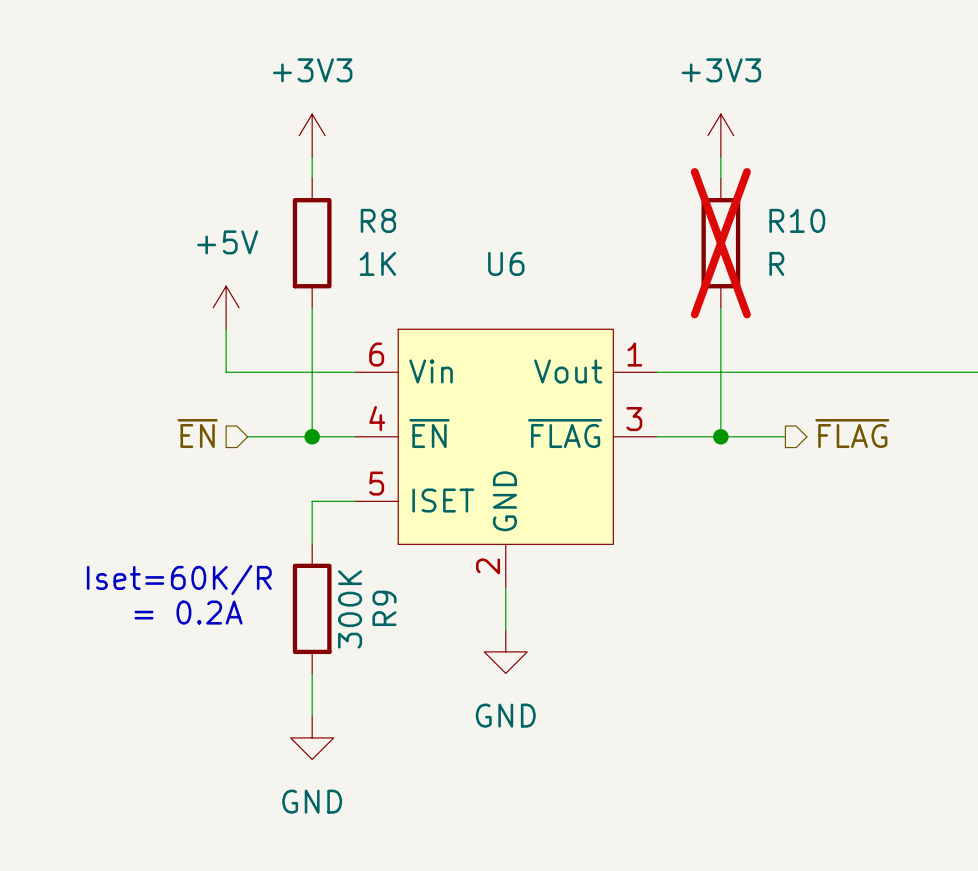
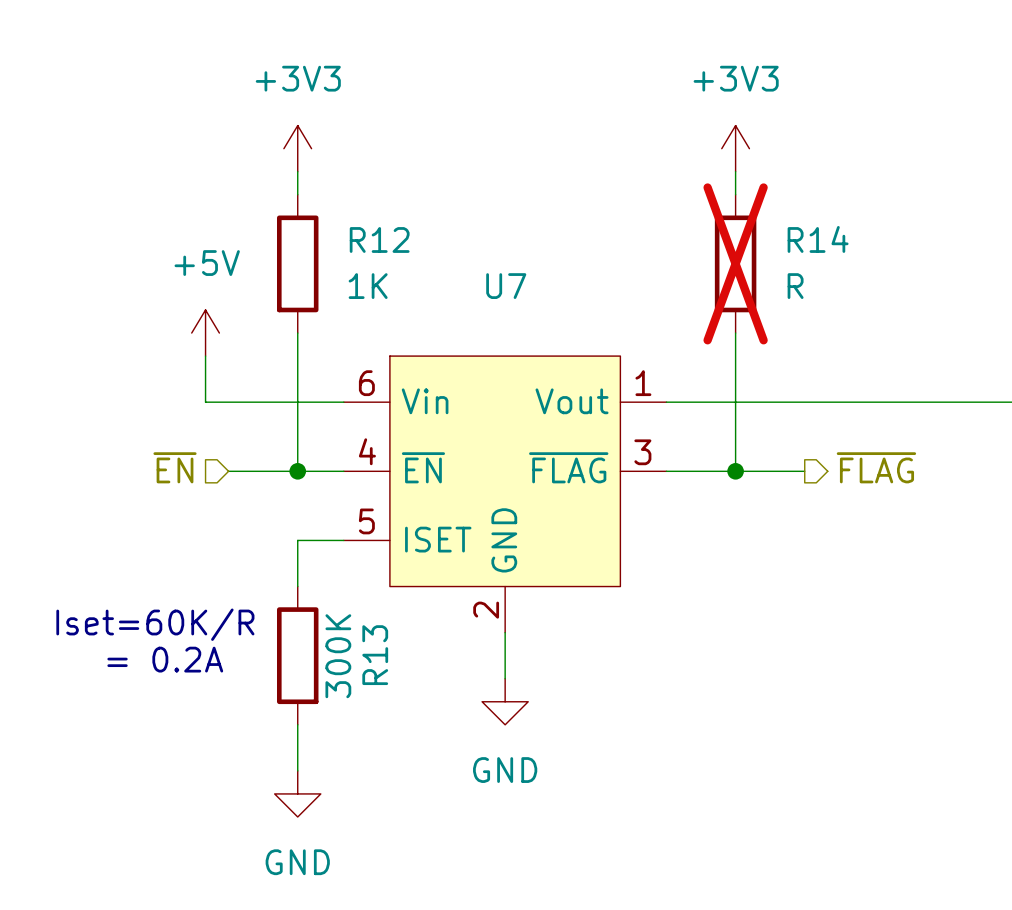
R8 name: R8 (378, 220) -> R12 (379, 239)
R10 name: R10 (797, 220) -> R14 (818, 239)
U6 name: U6 (506, 263) -> U7 (506, 286)
R9 name: R9 (384, 608) -> R13 (375, 655)

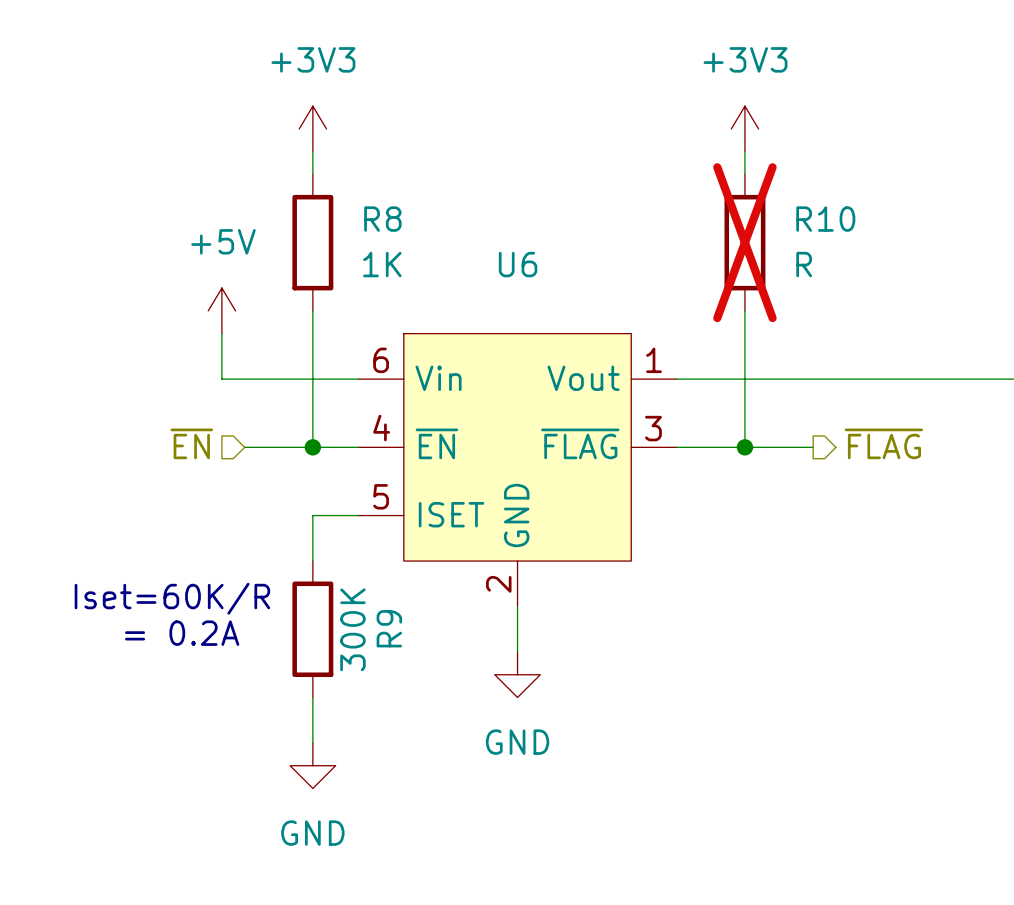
R12 name: R12 (379, 239) -> R8 (382, 219)
R14 name: R14 (818, 239) -> R10 (825, 219)
U7 name: U7 (506, 286) -> U6 (518, 264)
R13 name: R13 (375, 655) -> R9 (389, 628)

